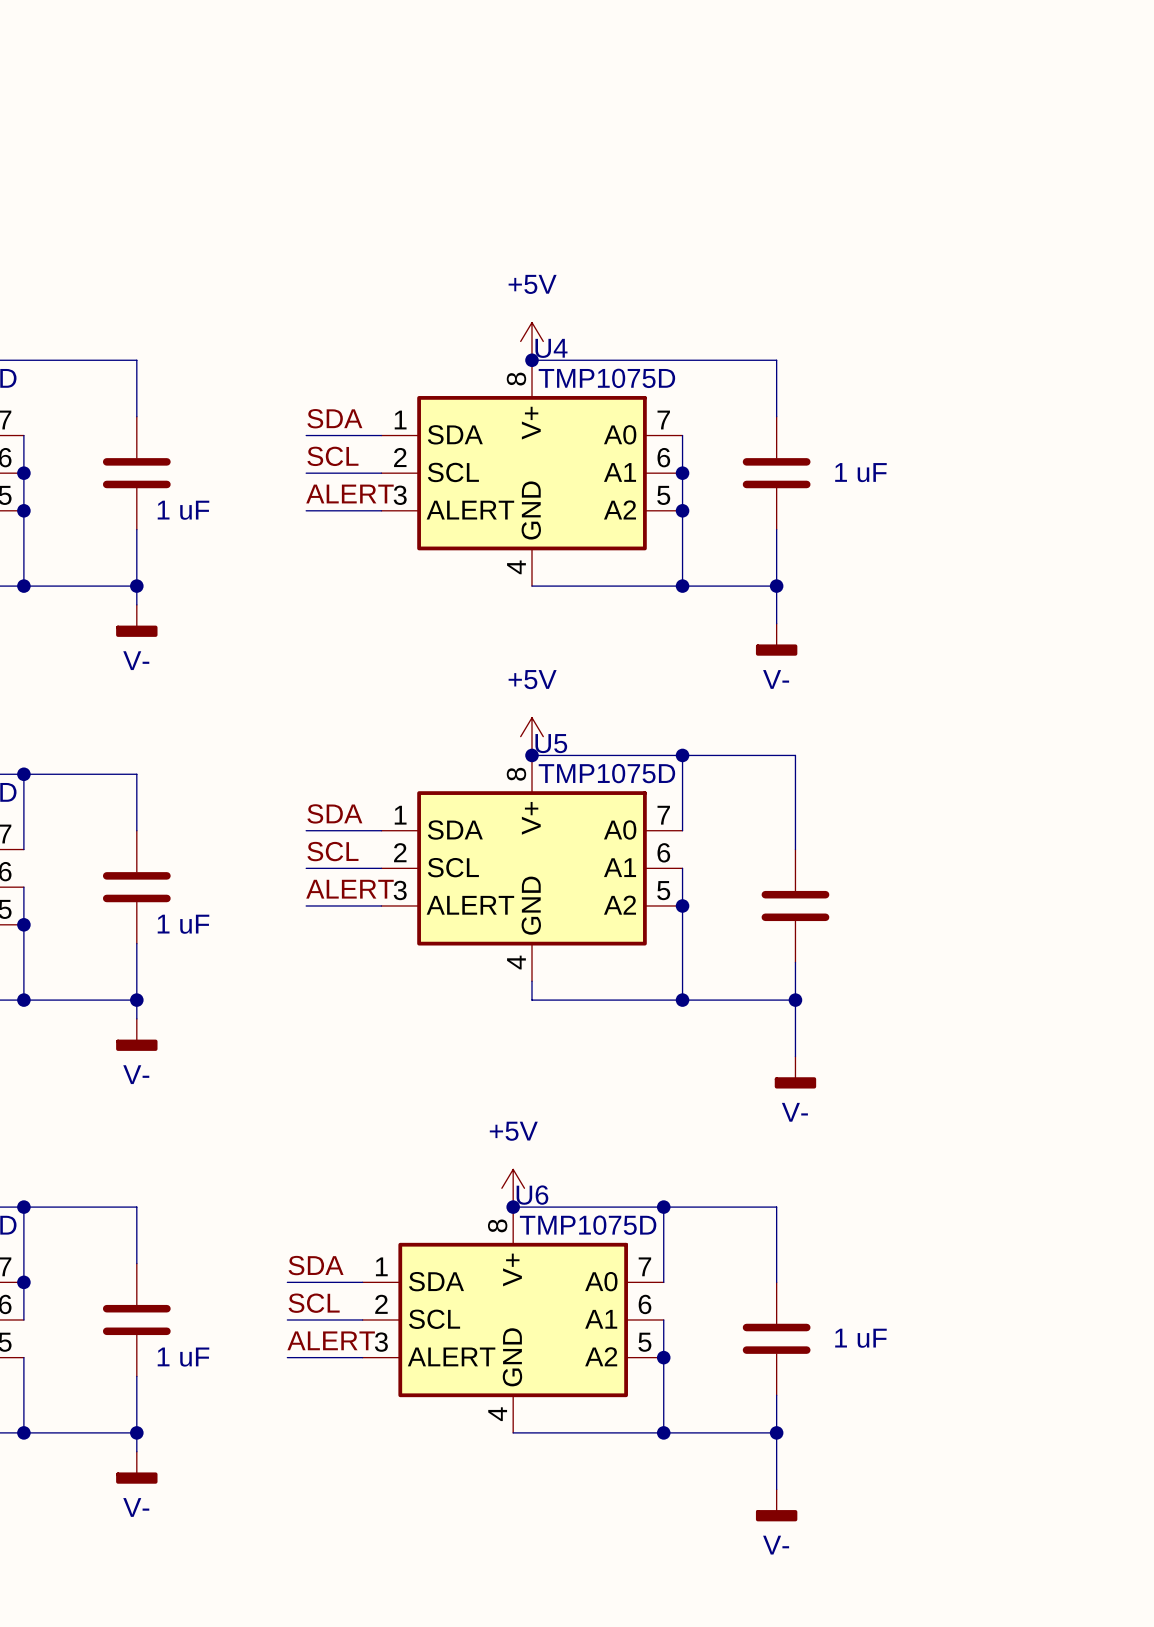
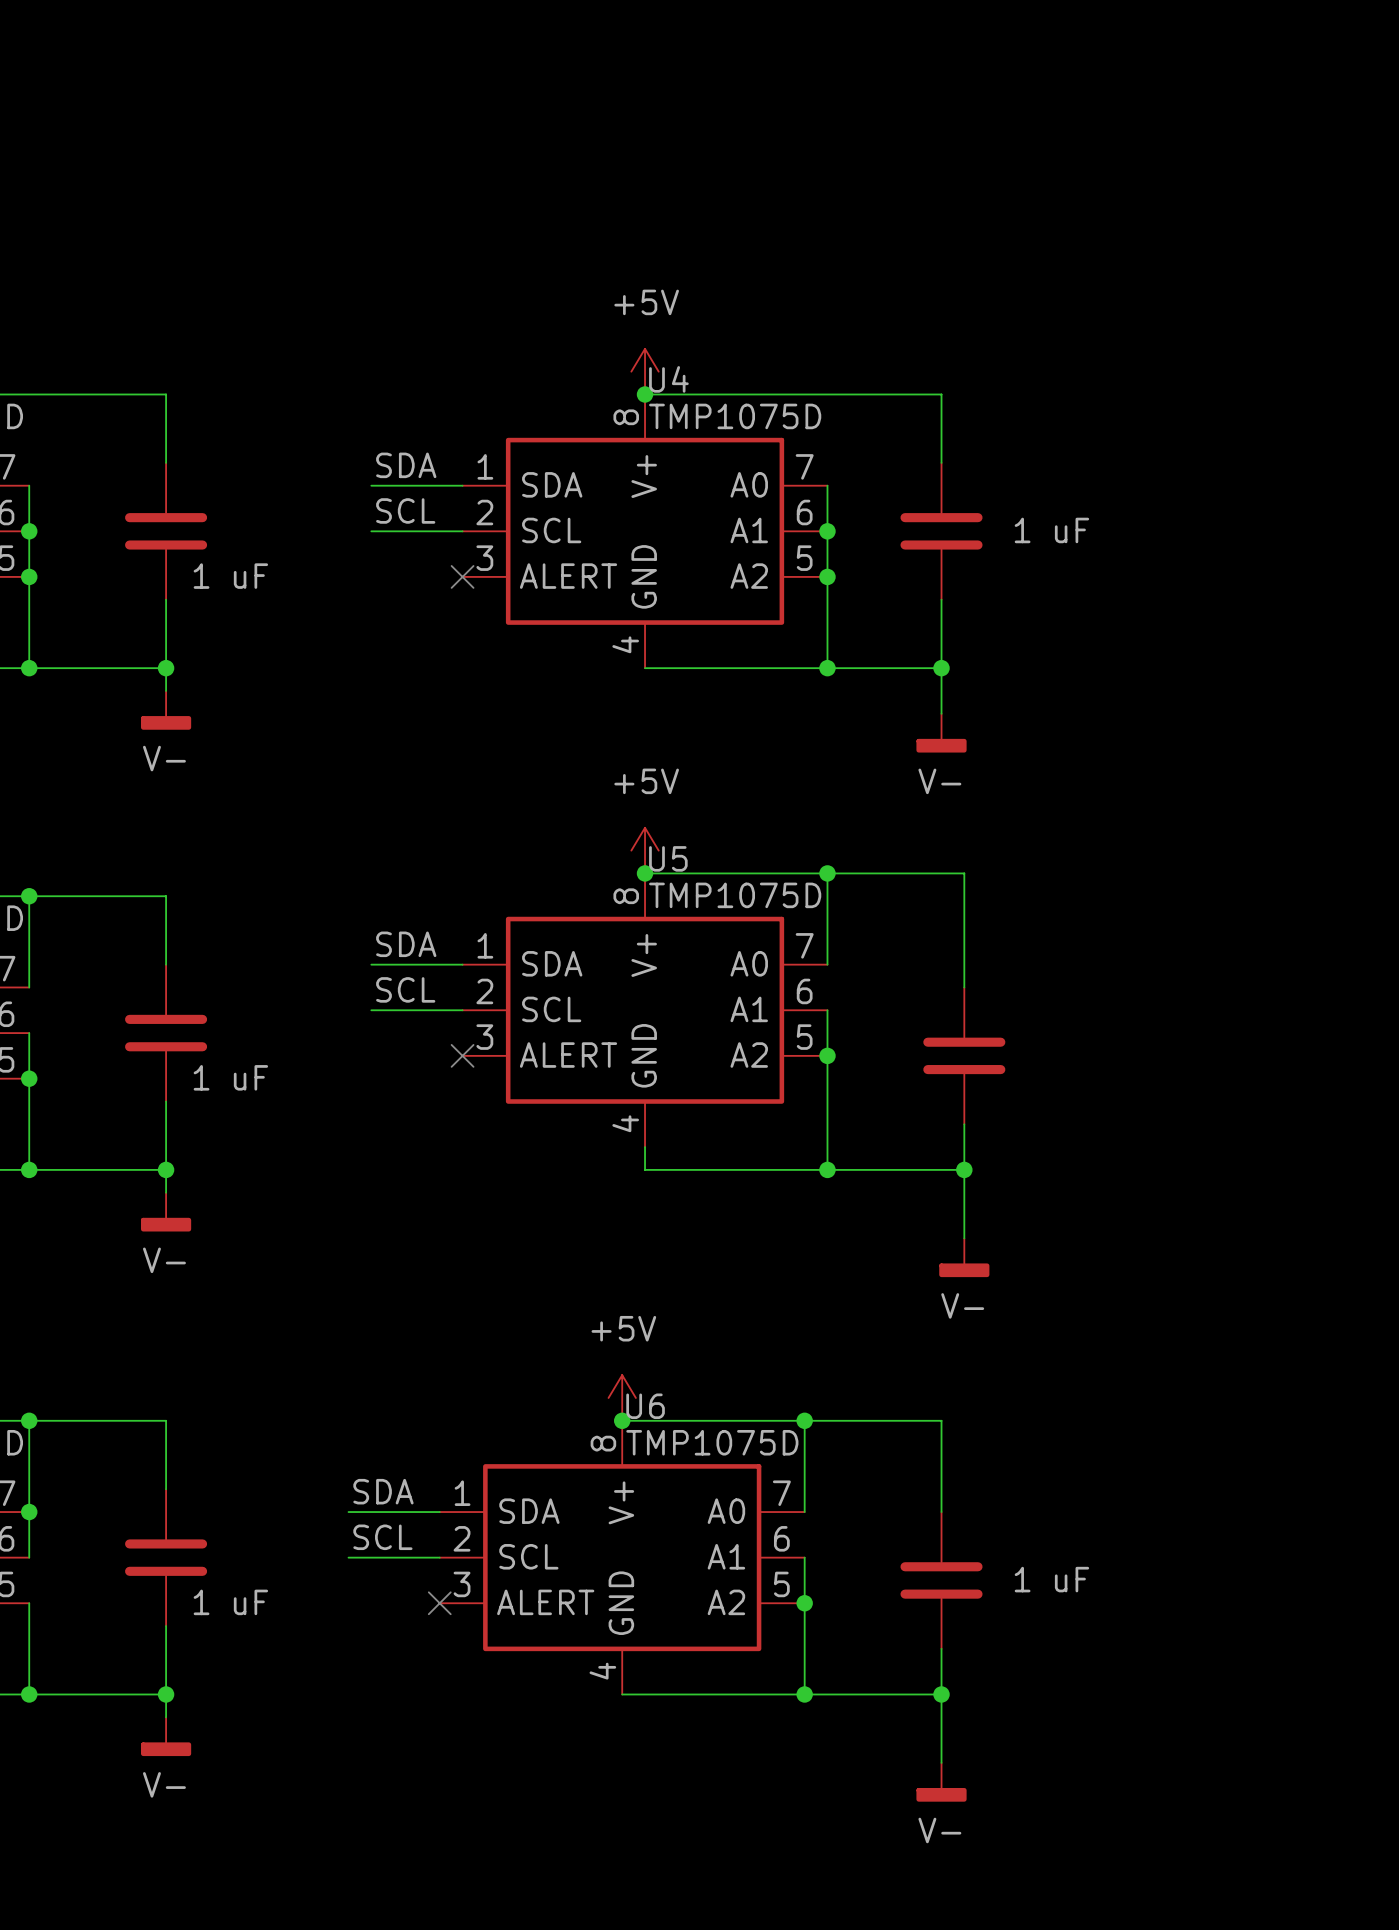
label: ALERT (349, 494) -> none
wire: (306, 510) (381, 510) -> none
no-connect mark: none -> (462, 576)
label: ALERT (349, 889) -> none
wire: (306, 905) (381, 905) -> none
no-connect mark: none -> (462, 1055)
label: ALERT (331, 1340) -> none
wire: (287, 1357) (362, 1357) -> none
no-connect mark: none -> (439, 1603)

